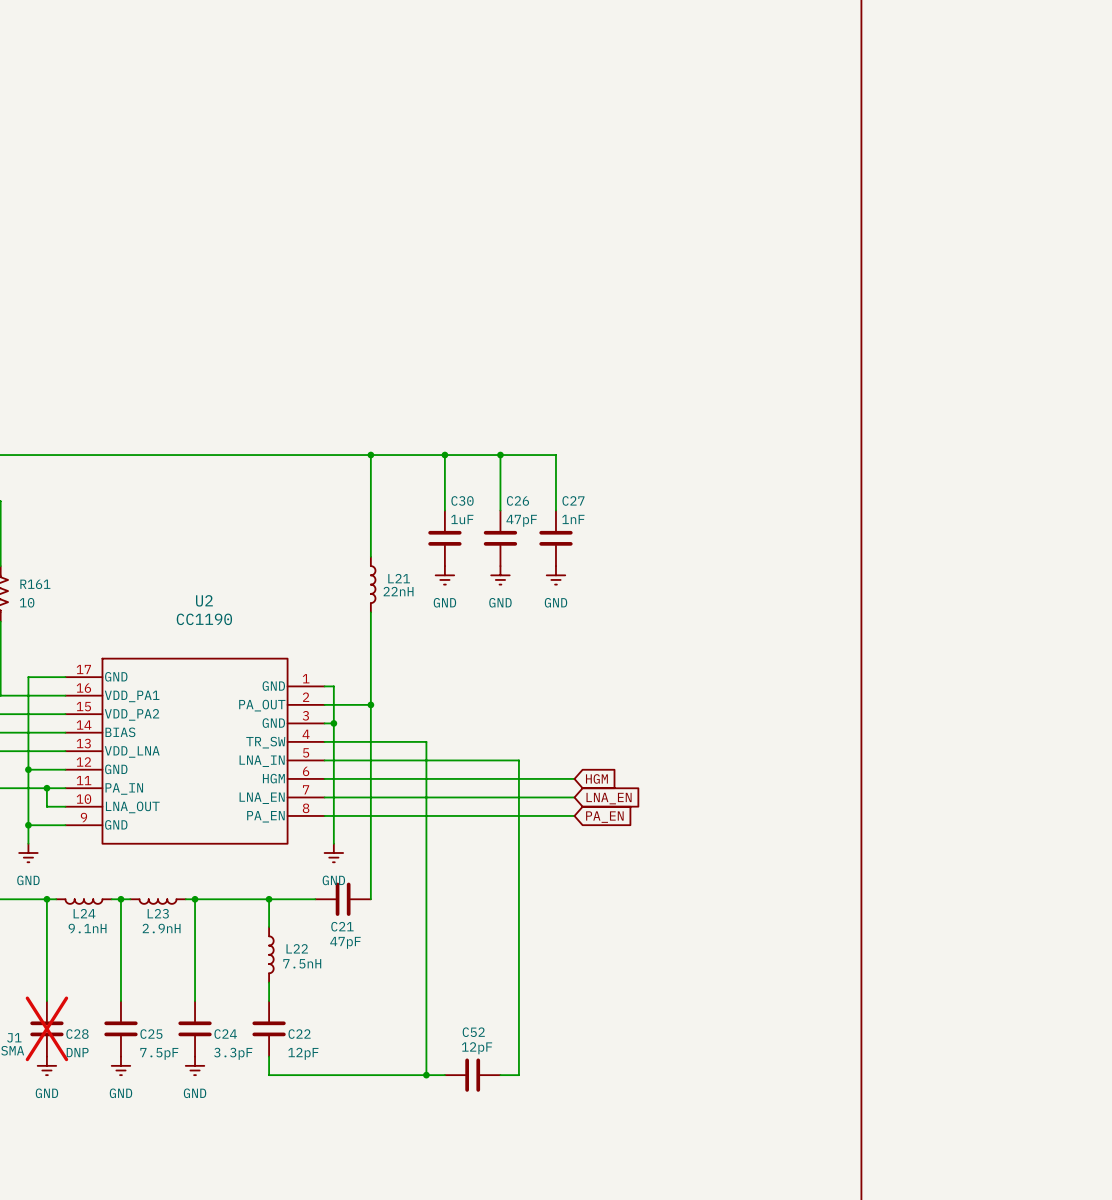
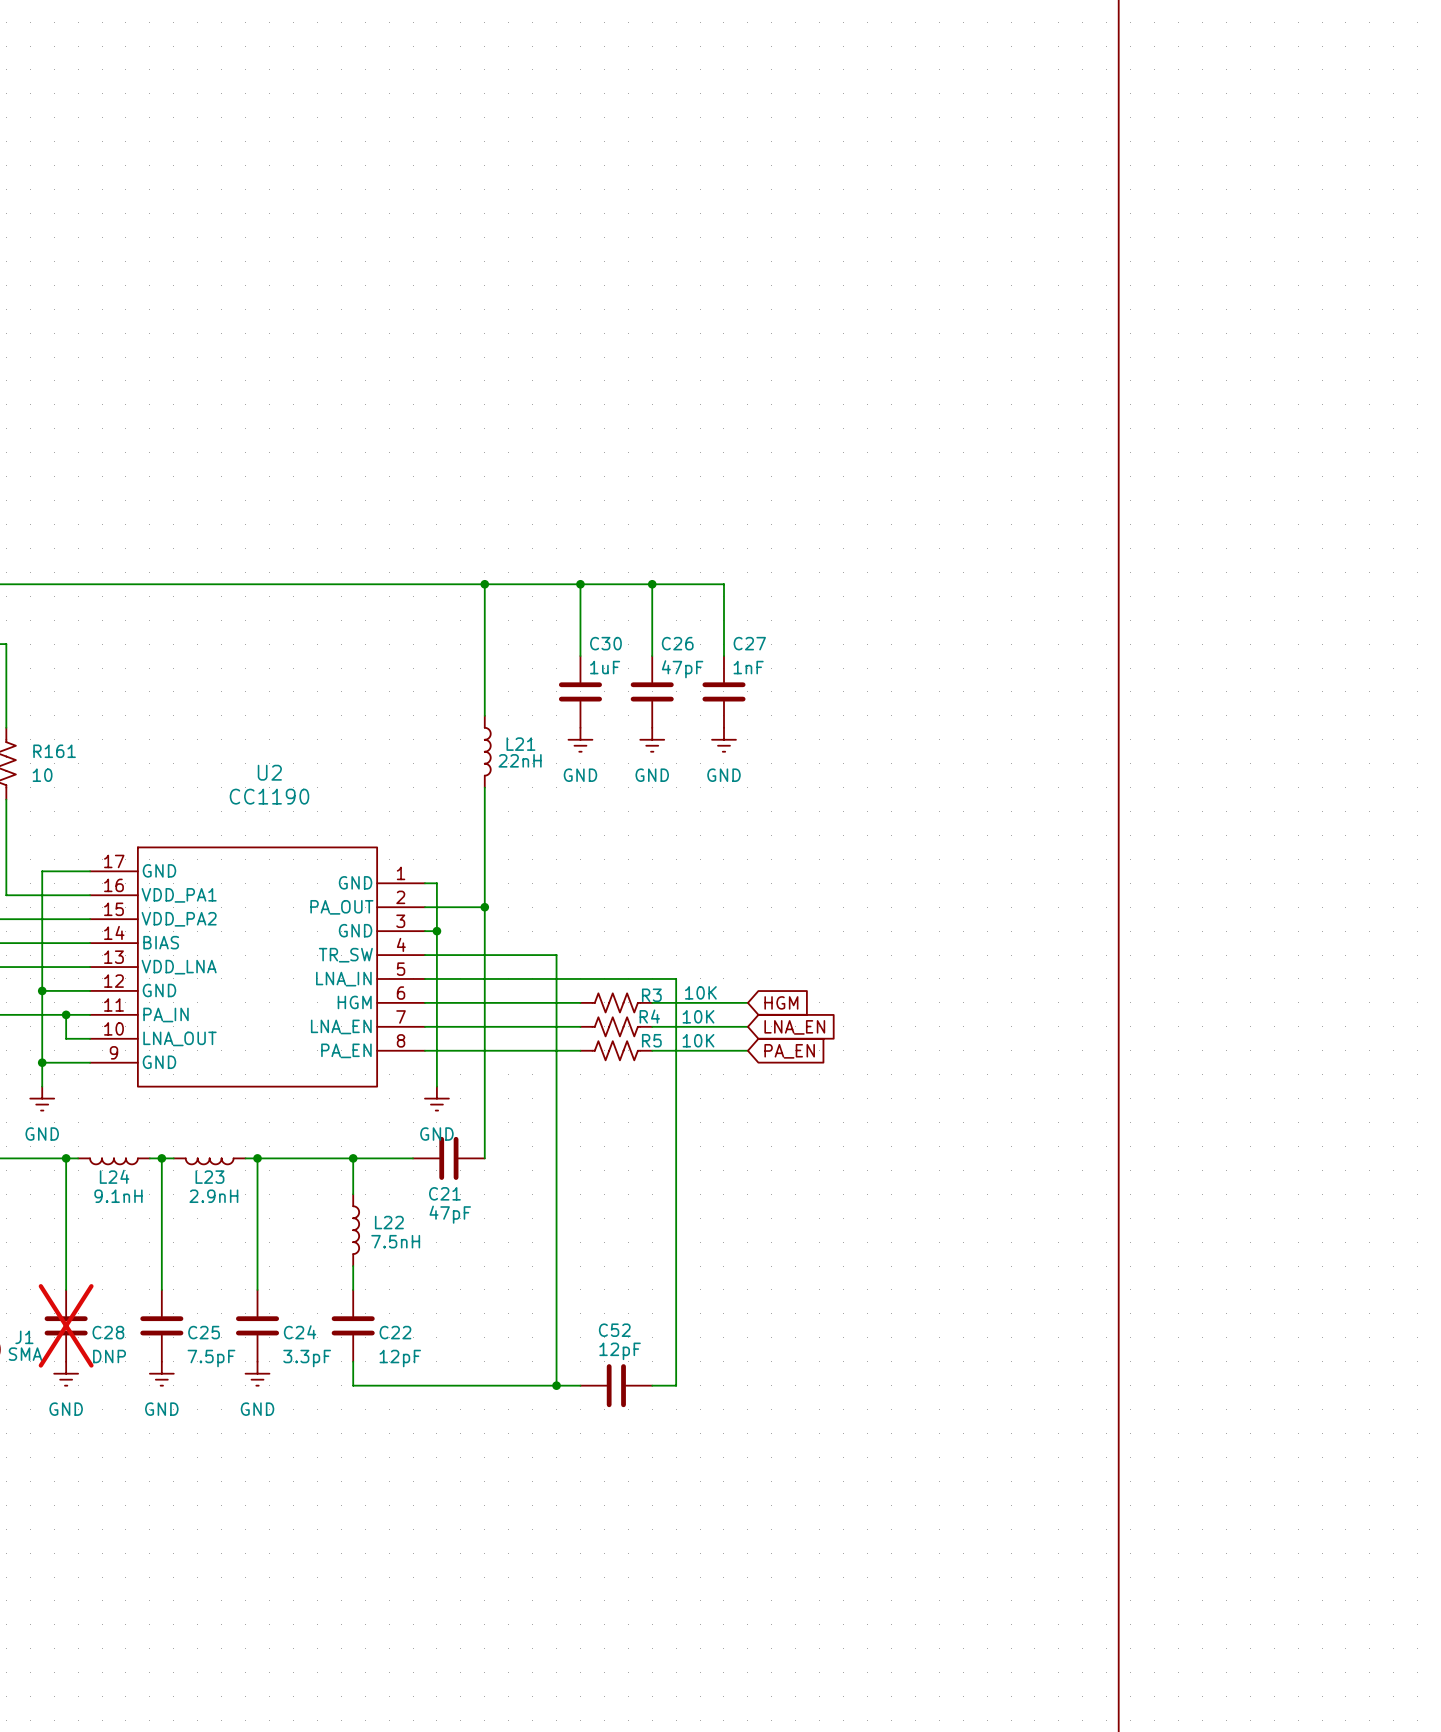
R3: none -> 10K (616, 1002)
R4: none -> 10K (616, 1026)
R5: none -> 10K (616, 1050)

